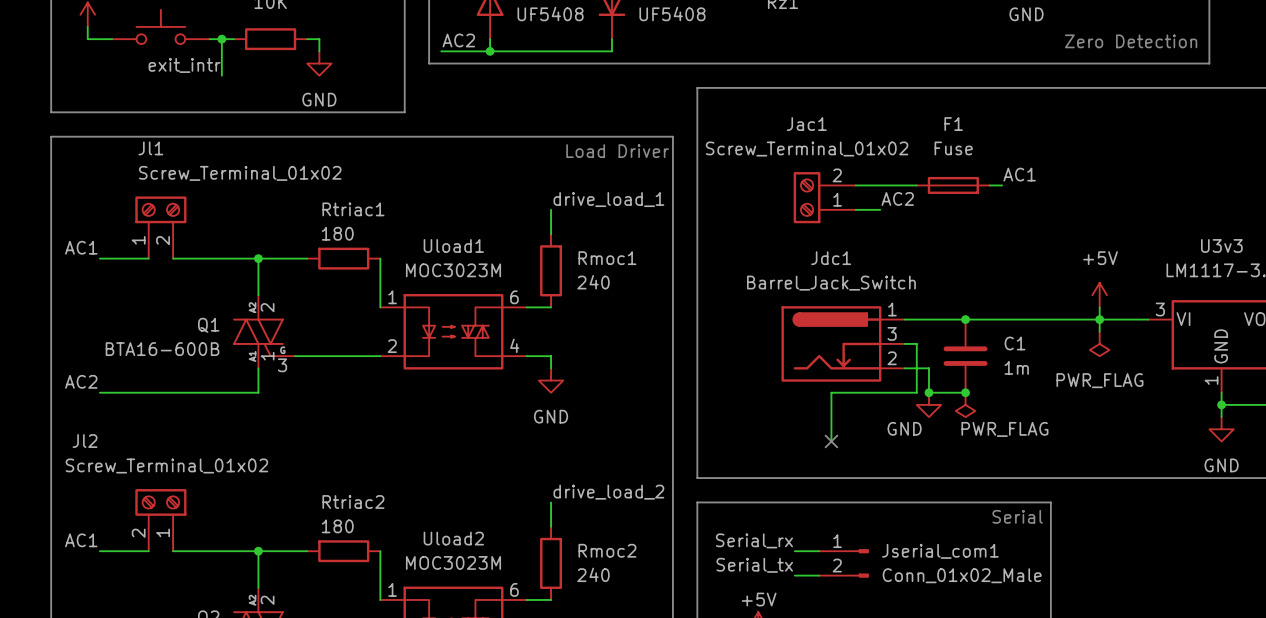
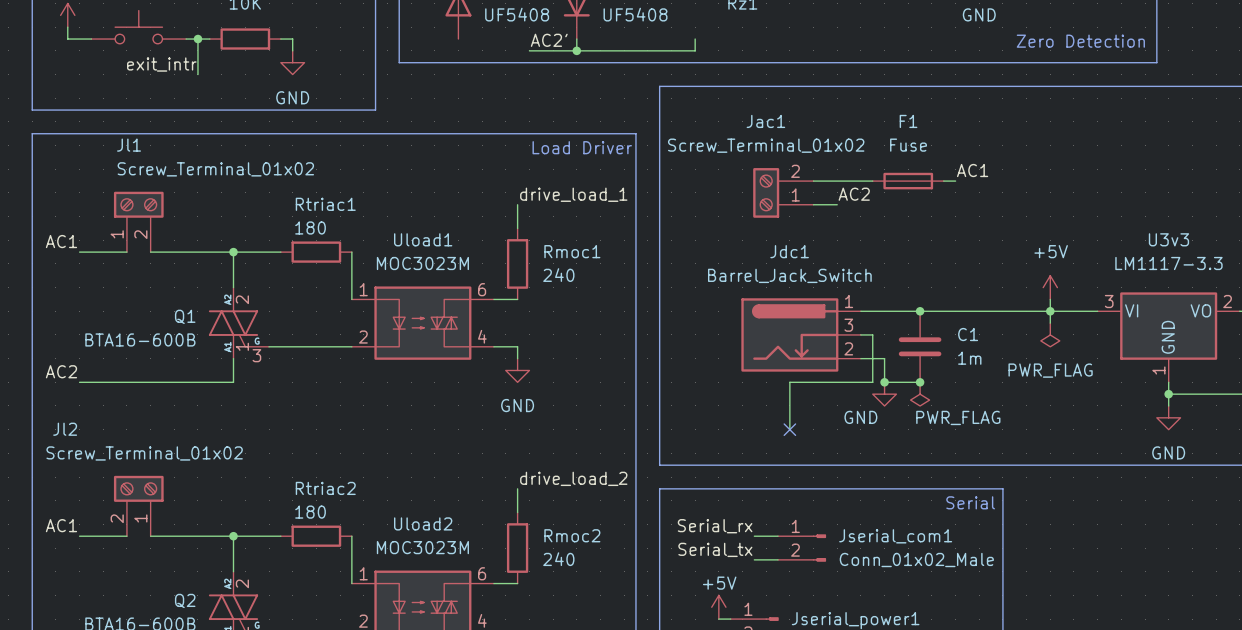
wire: (490, 39) (490, 51) -> none
wire: none -> (695, 39) (695, 50) (576, 50)
label: AC2 (458, 40) -> none
label: none -> AC2' (549, 40)
wire: (441, 51) (563, 51) -> none
junction: (490, 51) -> none
junction: none -> (576, 50)

